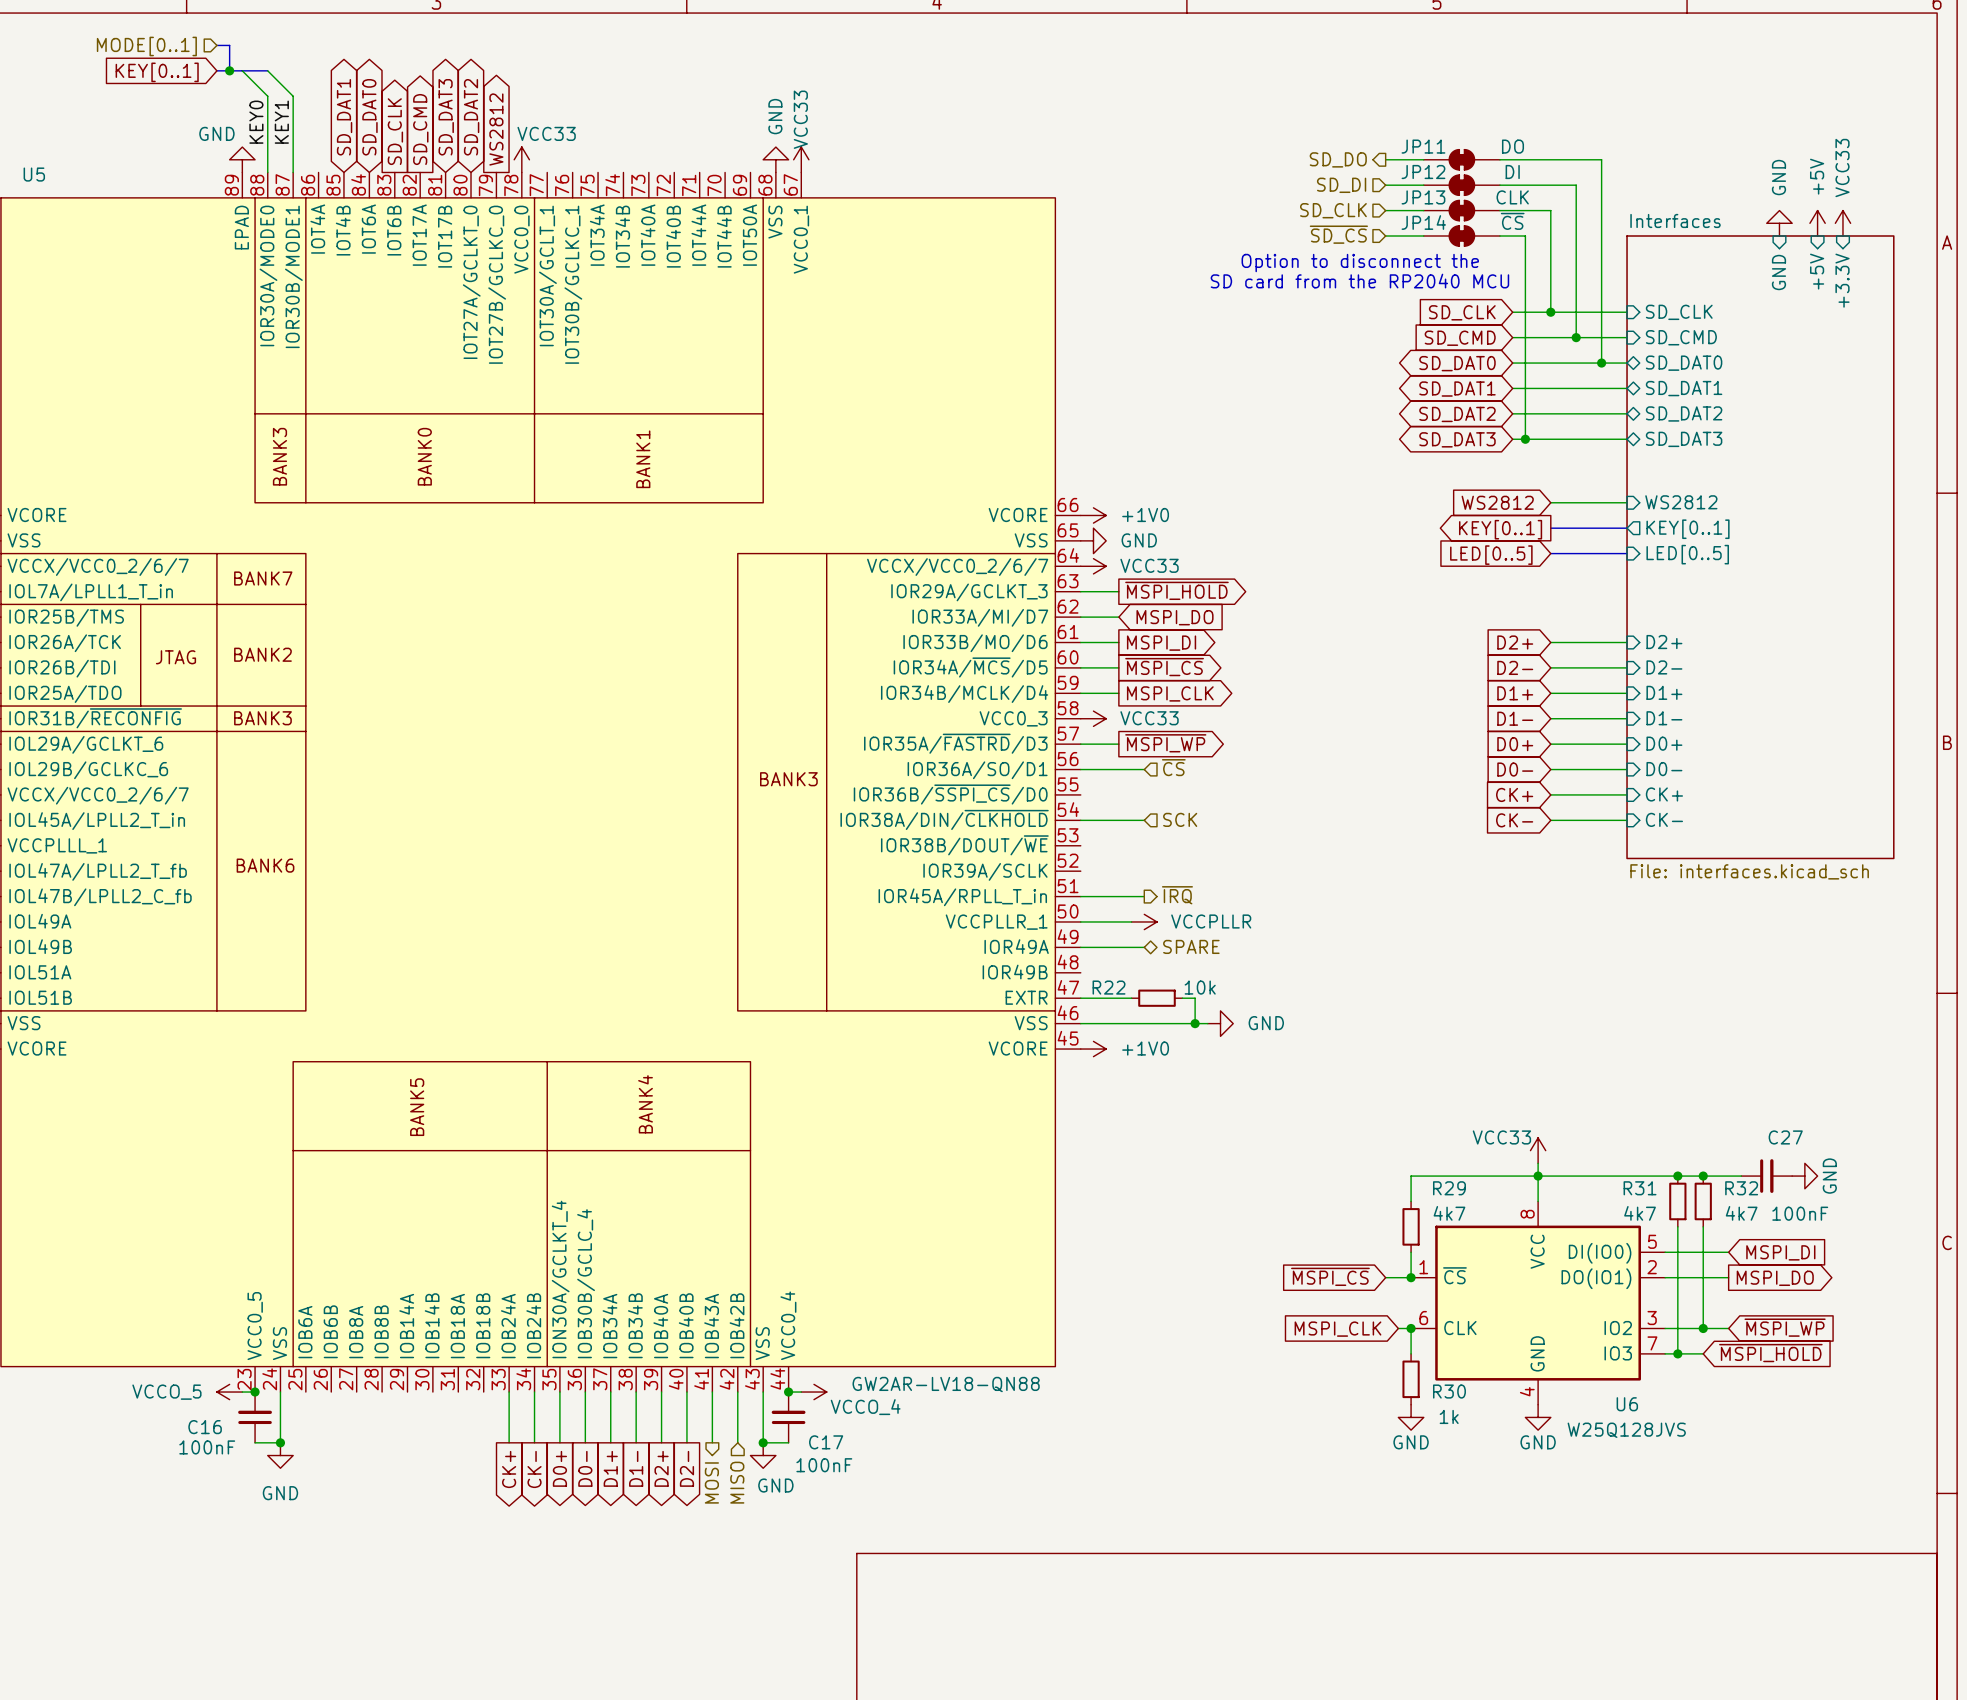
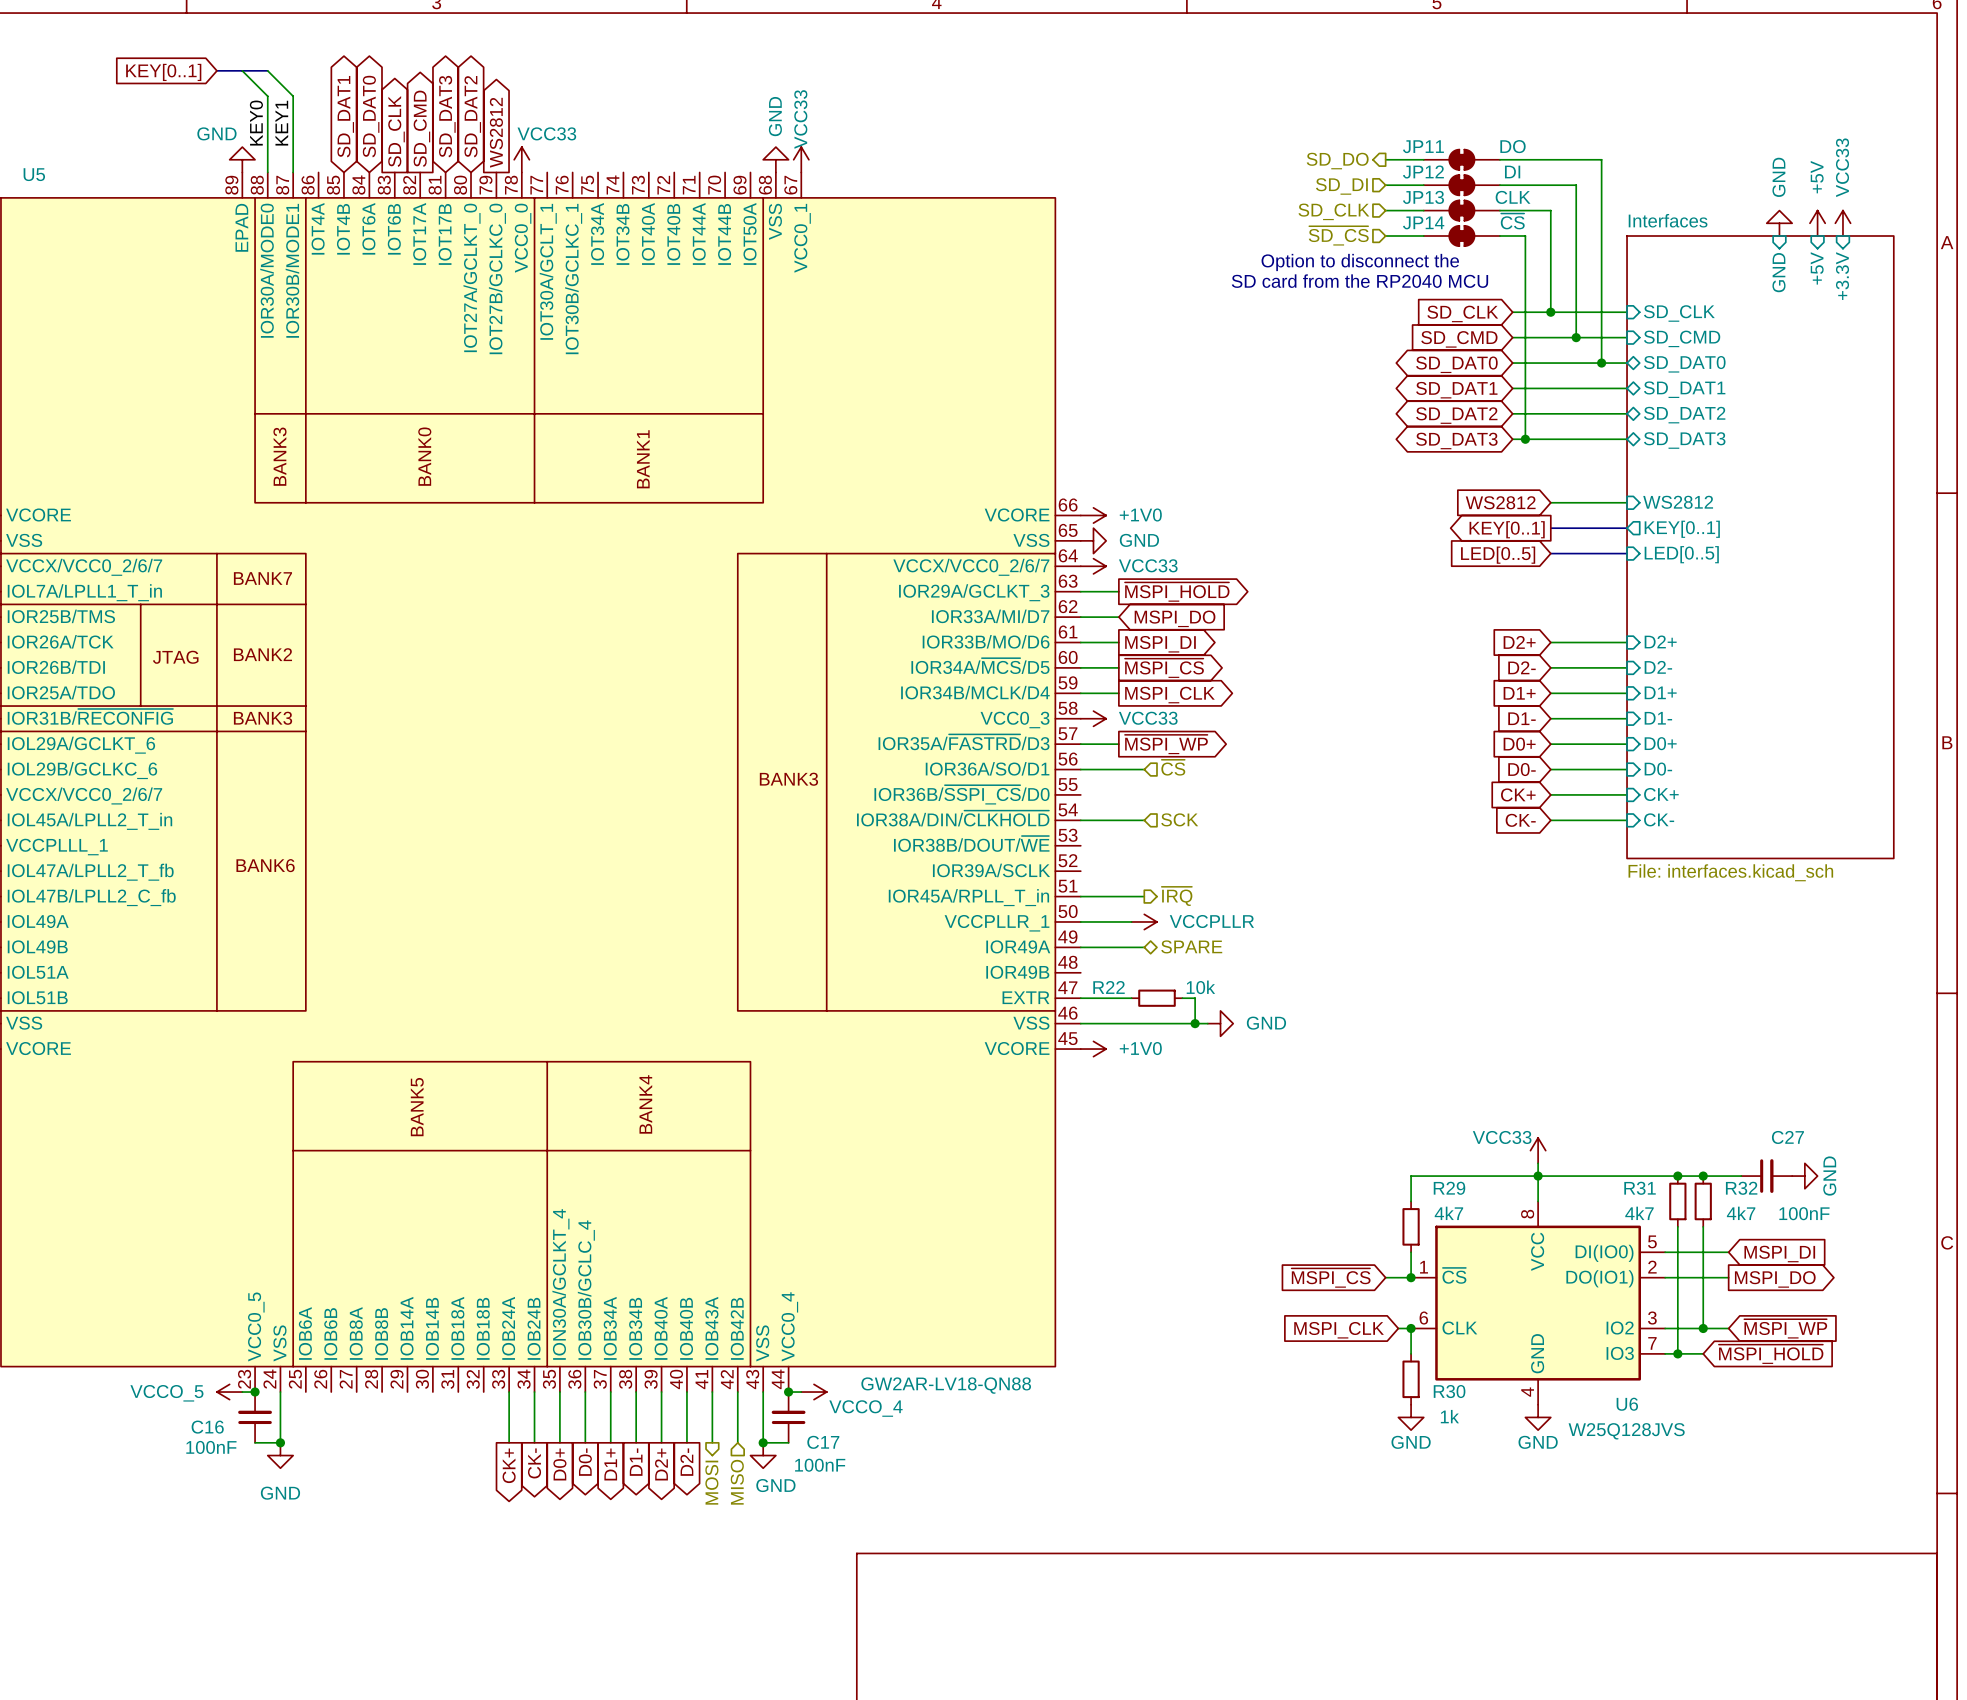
bus: (216, 45) (229, 45) (229, 70) -> none
hierarchical label: MODE[0..1] (146, 46) -> none
junction: (229, 70) -> none

